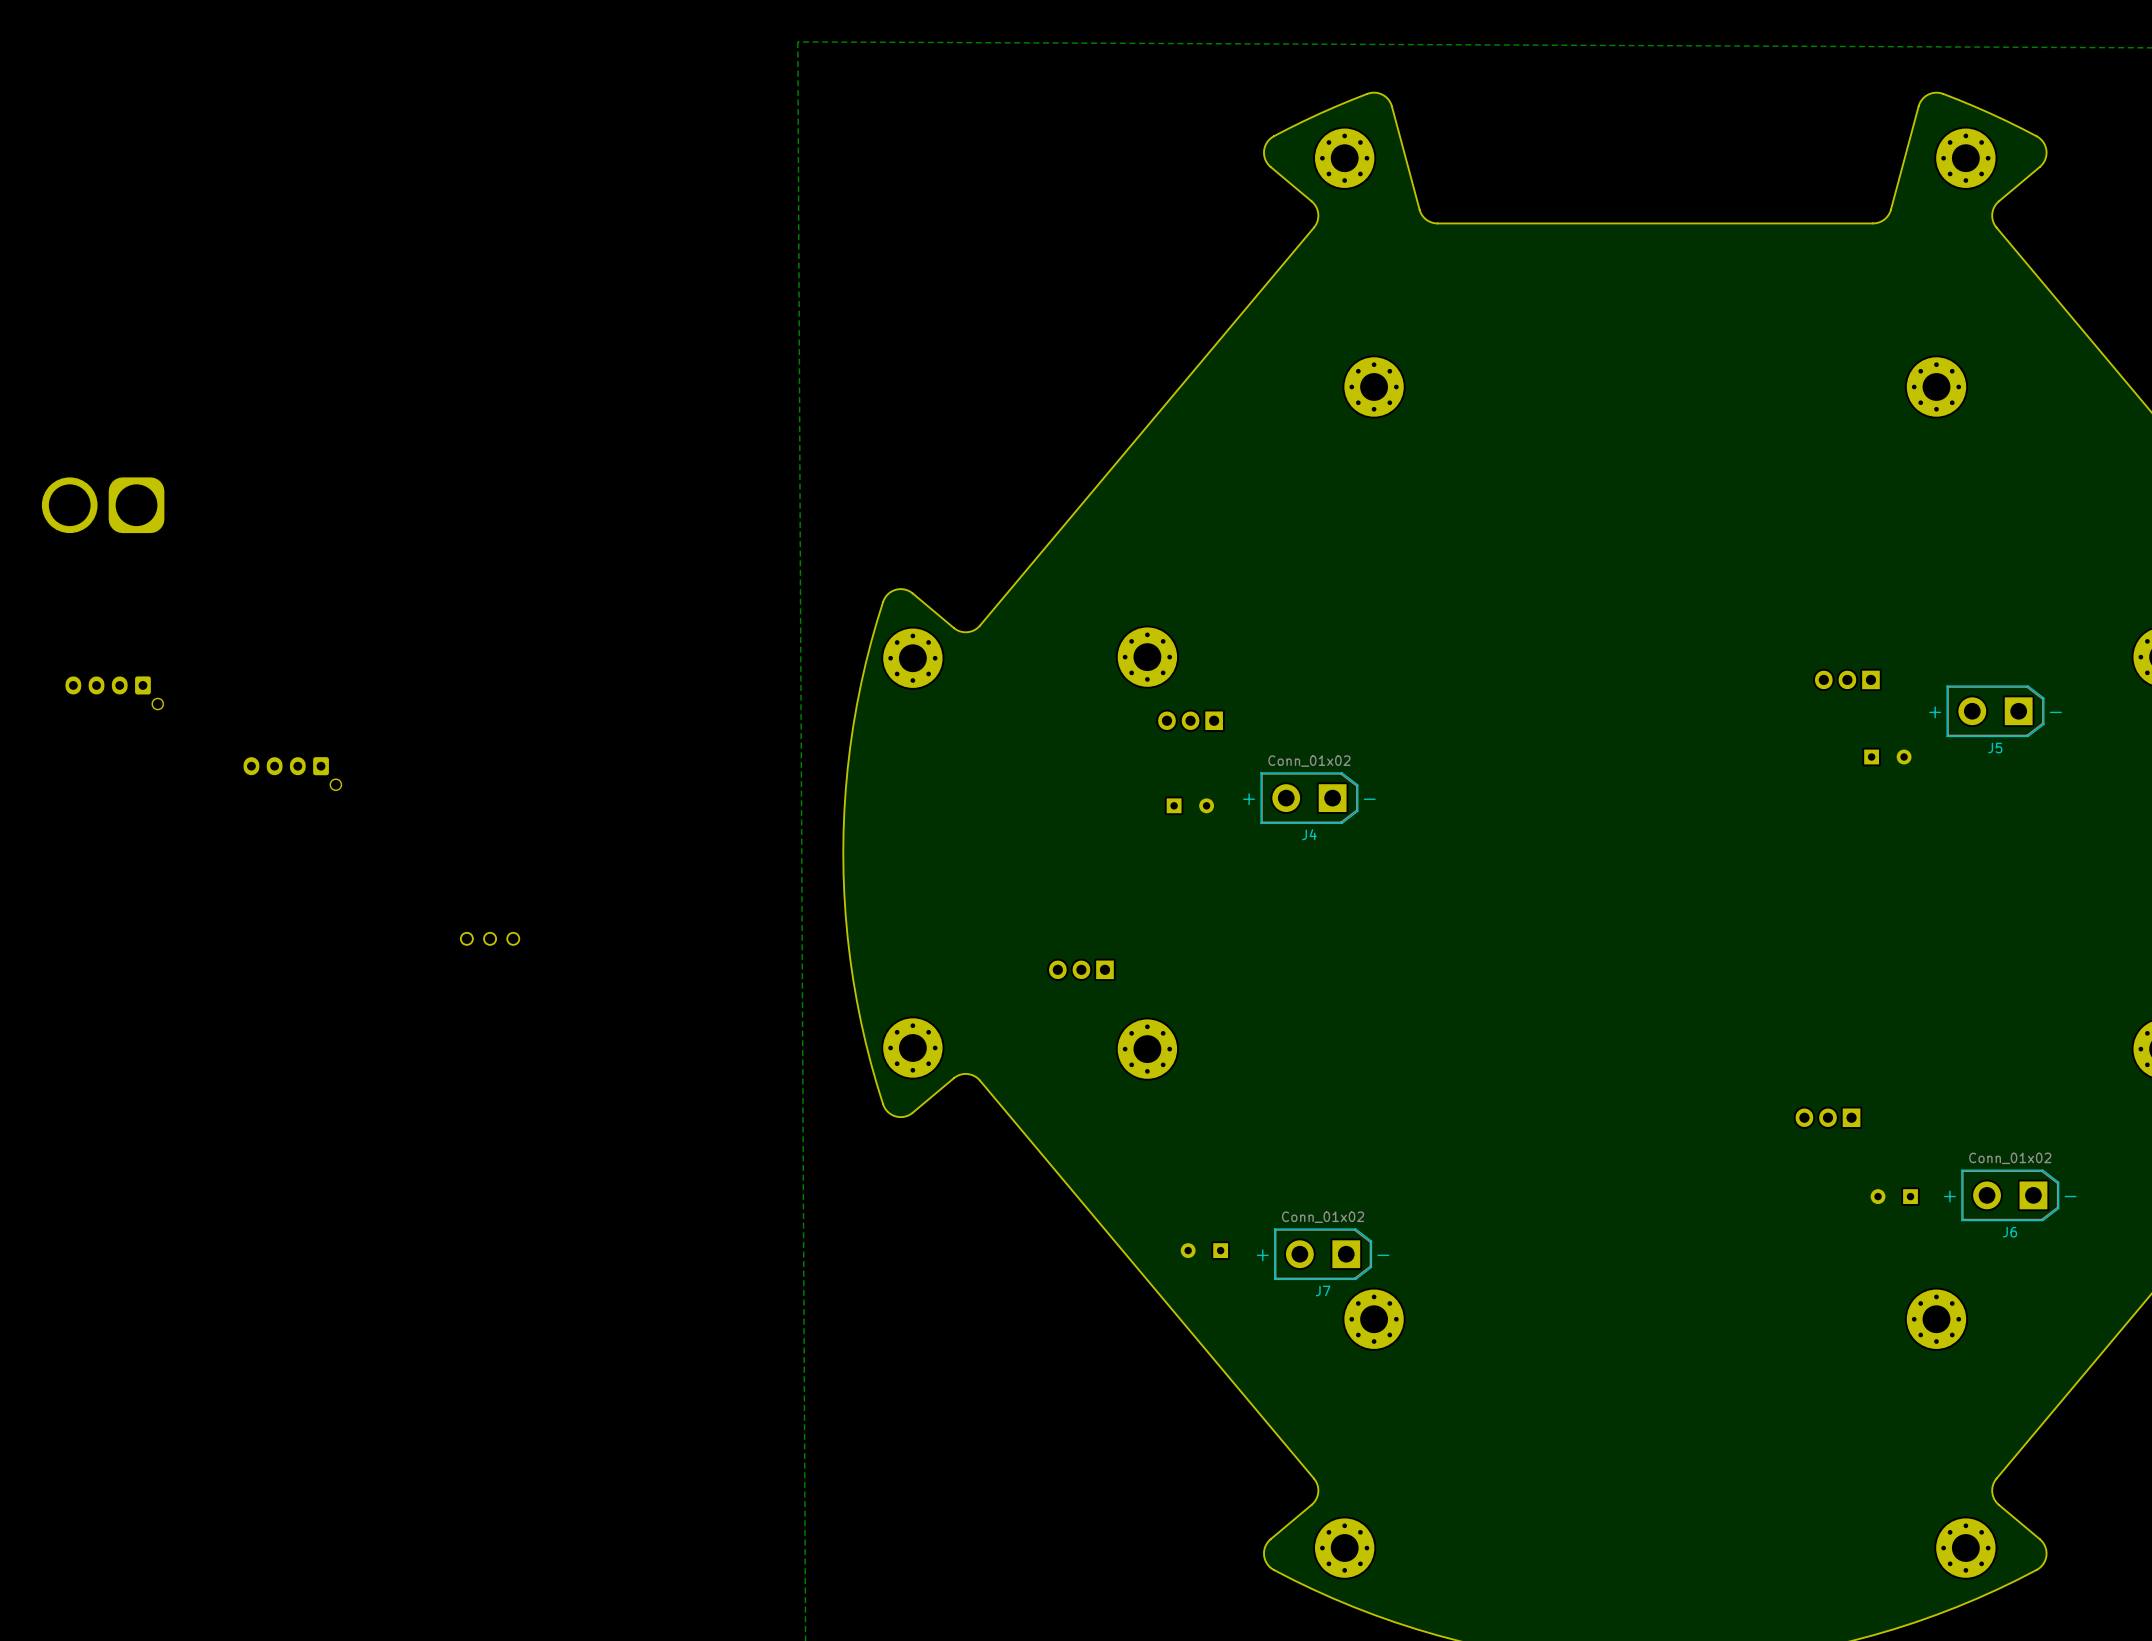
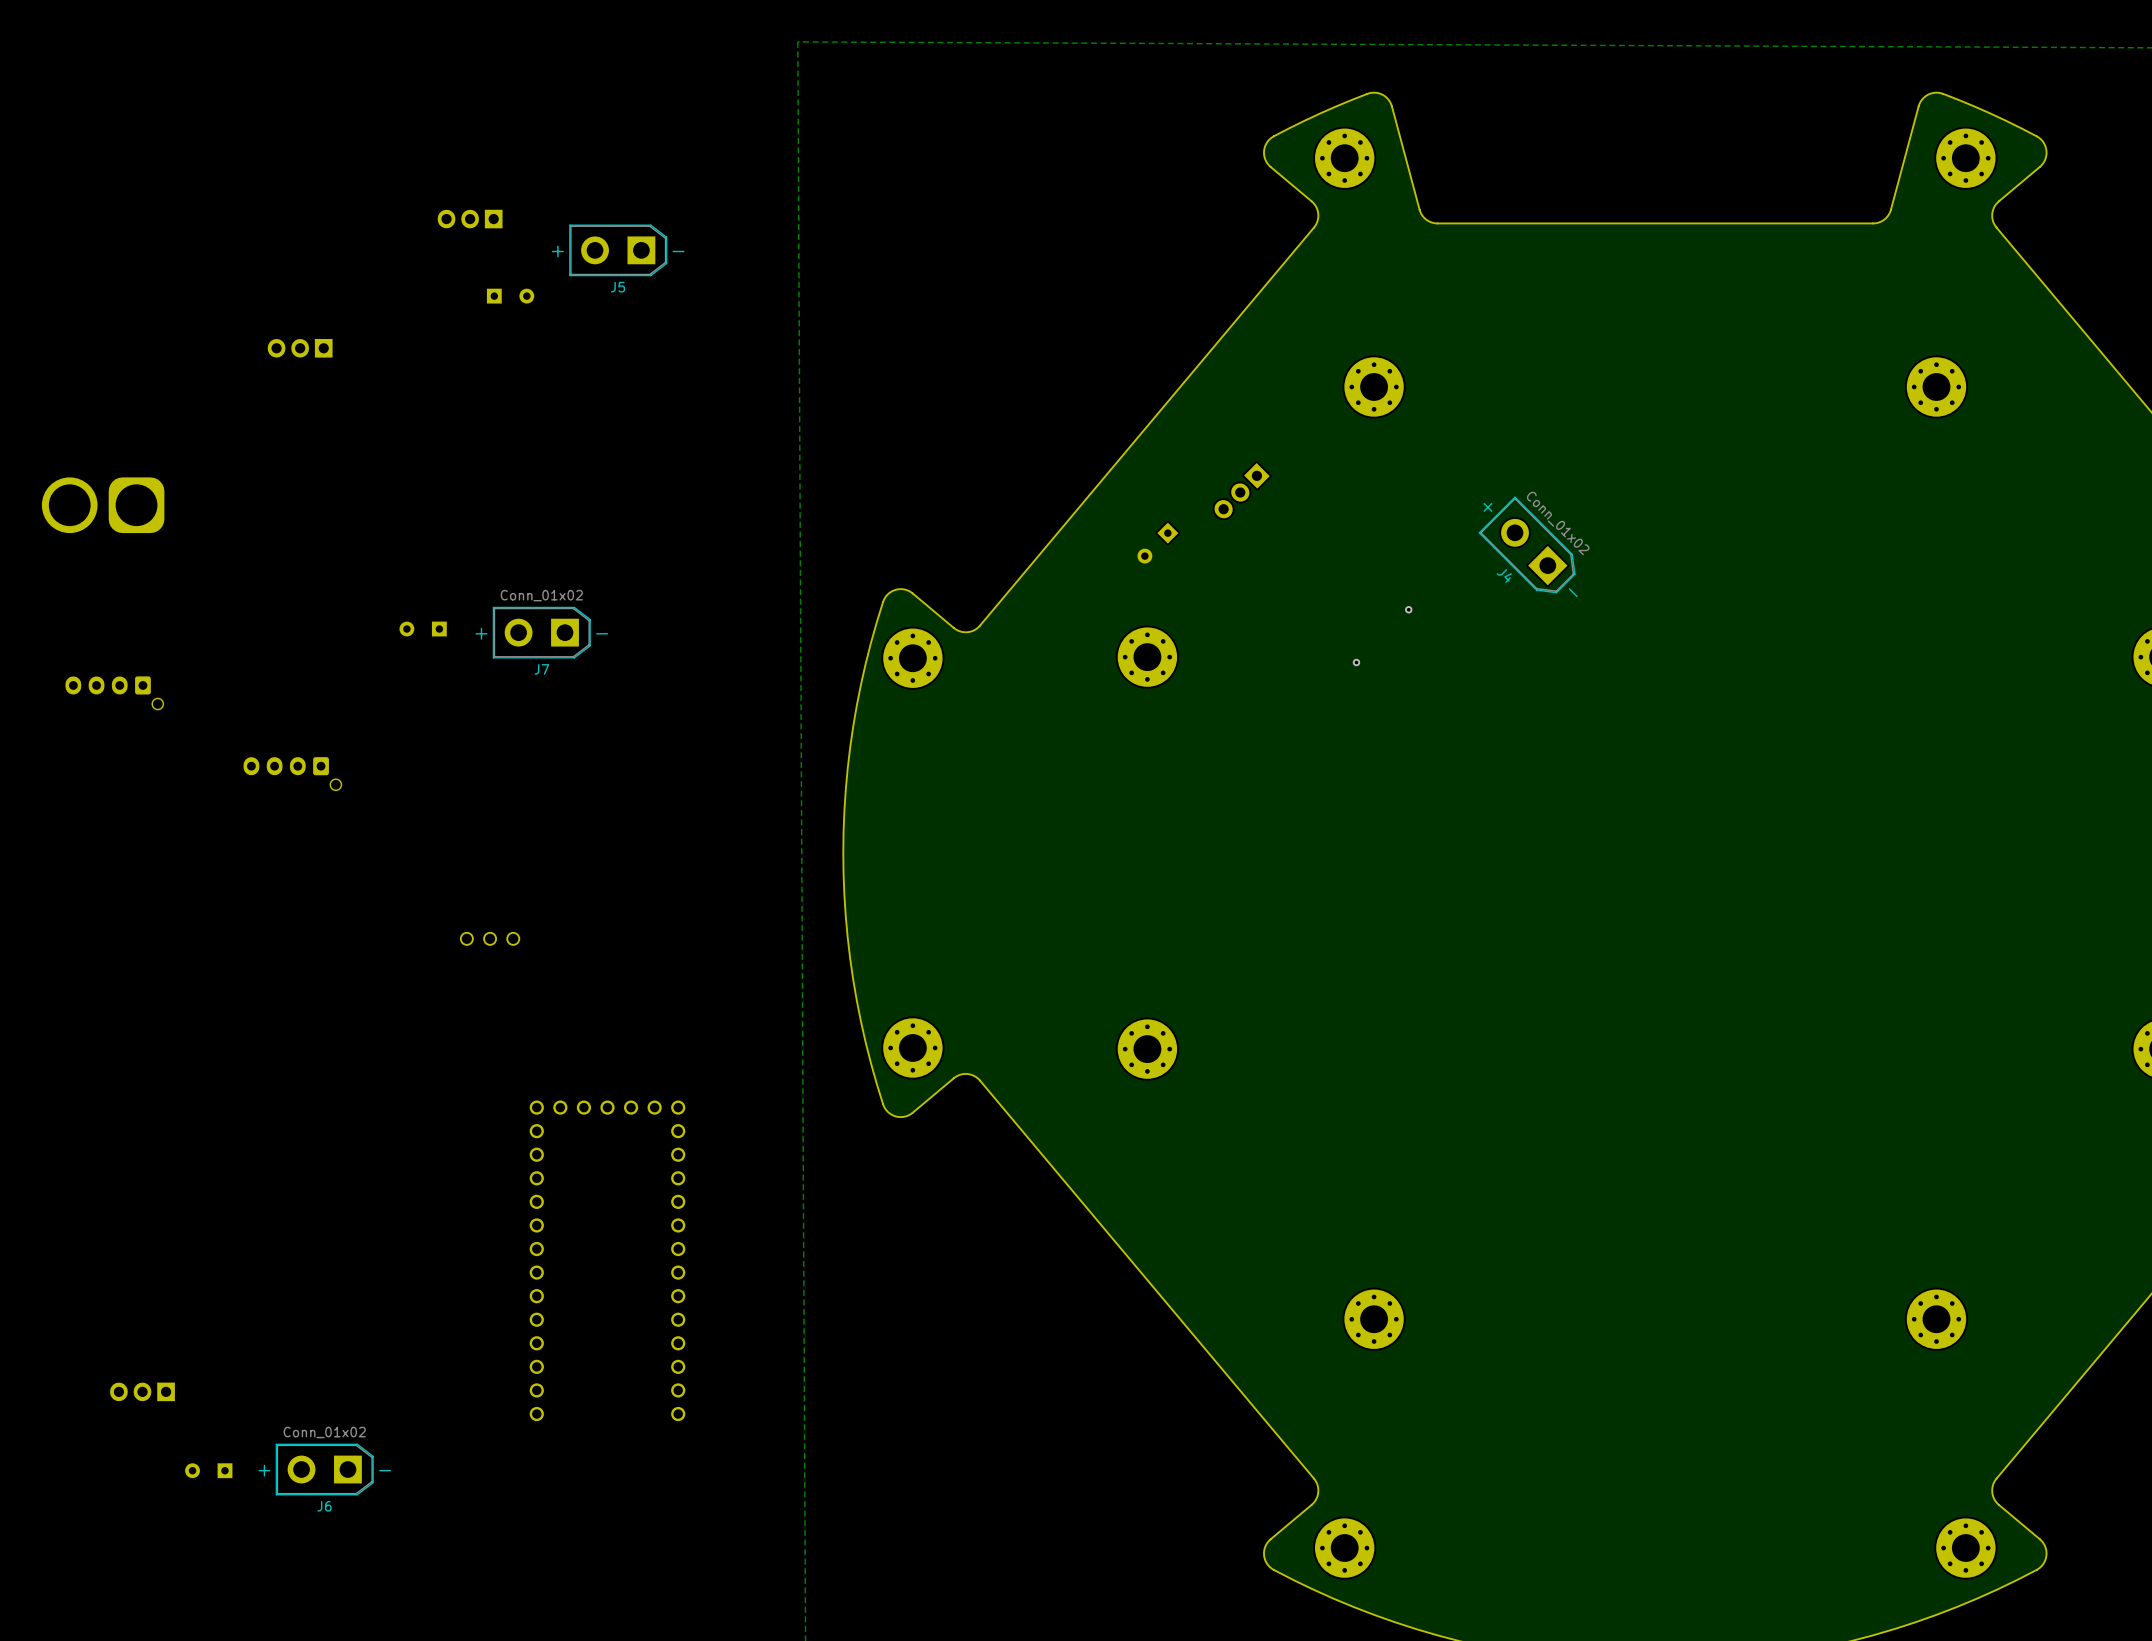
part: none -> (470, 219)
part: none -> (510, 296)
part: none -> (300, 348)
part: none -> (1242, 490)
part: none -> (1157, 543)
via: none -> (1408, 609)
part: none -> (423, 629)
via: none -> (1356, 662)
part: (1847, 679) -> none
J5 position: (1995, 711) -> (618, 250)
part: (1190, 720) -> none
part: (1887, 757) -> none
J4 rotation: 0° (1309, 798) -> 45° clockwise (1527, 544)
J4 position: (1309, 798) -> (1527, 544)
part: (1190, 805) -> none
part: (1081, 969) -> none
part: (1827, 1117) -> none
J6 position: (2010, 1195) -> (324, 1469)
part: (1894, 1196) -> none
part: (1204, 1250) -> none
J7 position: (1323, 1254) -> (541, 632)
part: none -> (607, 1260)
part: none -> (142, 1391)
part: none -> (208, 1470)

